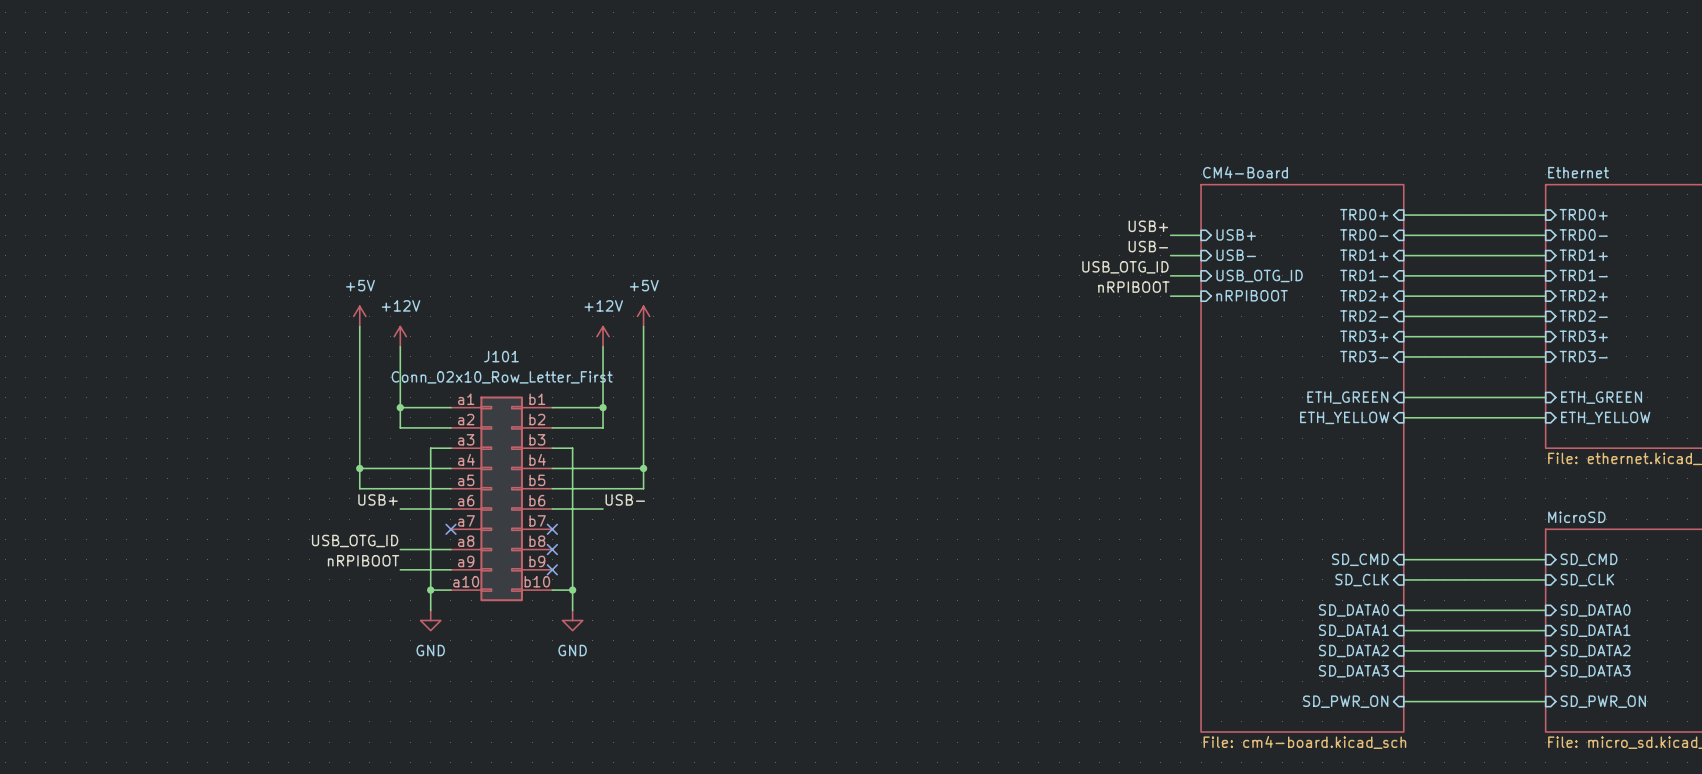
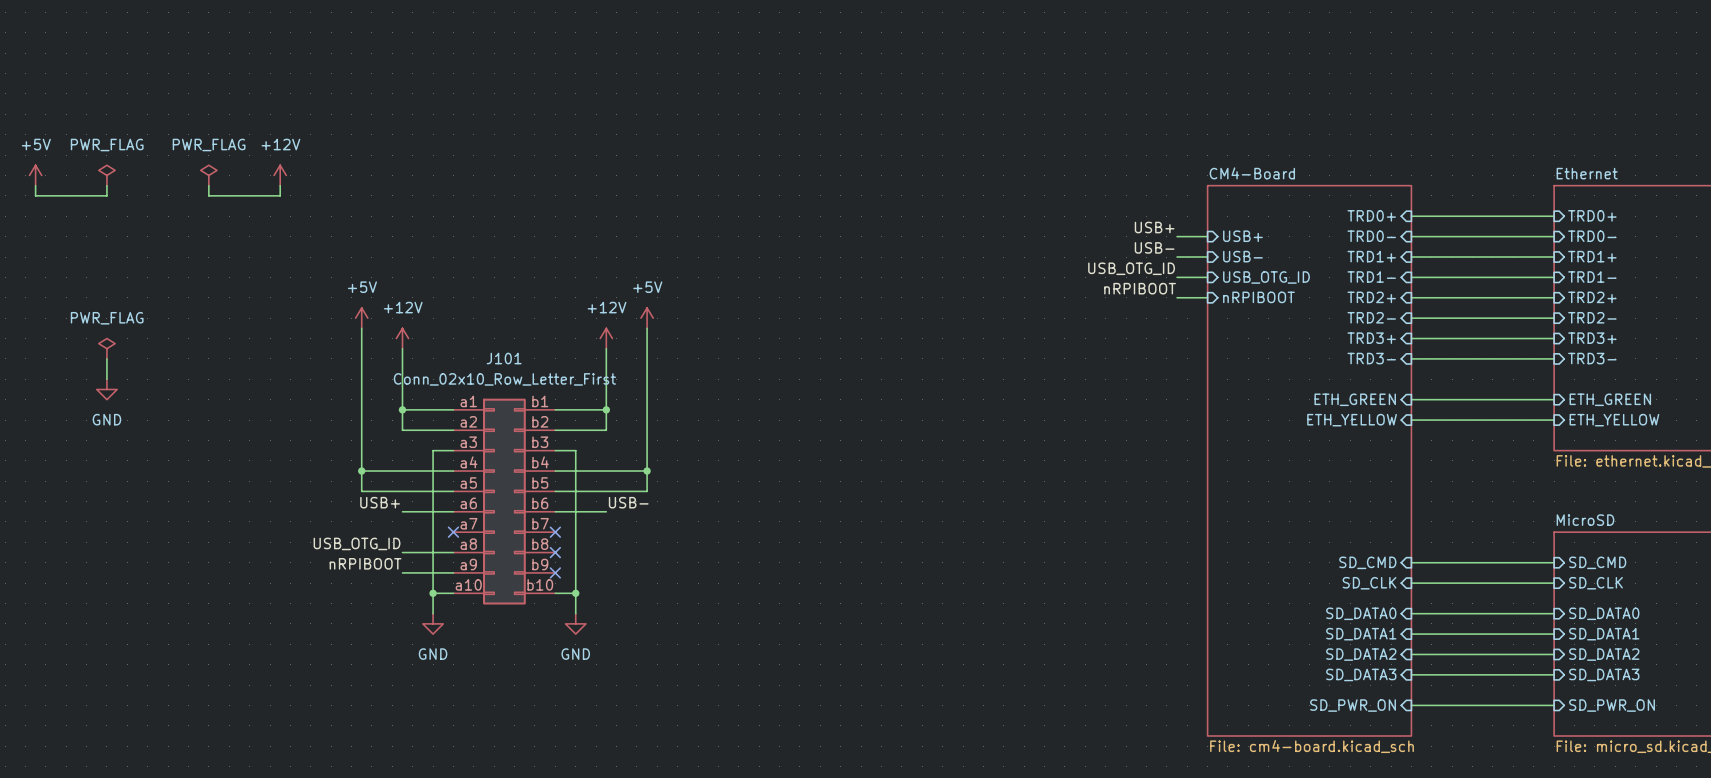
power symbol: none -> +5V (35, 175)
power symbol: none -> PWR_FLAG (106, 175)
power symbol: none -> PWR_FLAG (208, 175)
power symbol: none -> +12V (280, 175)
wire: none -> (35, 185) (35, 195) (106, 195) (106, 185)
wire: none -> (208, 185) (208, 195) (280, 195) (280, 185)
power symbol: none -> PWR_FLAG (106, 348)
wire: none -> (106, 358) (106, 379)
power symbol: none -> GND (106, 389)

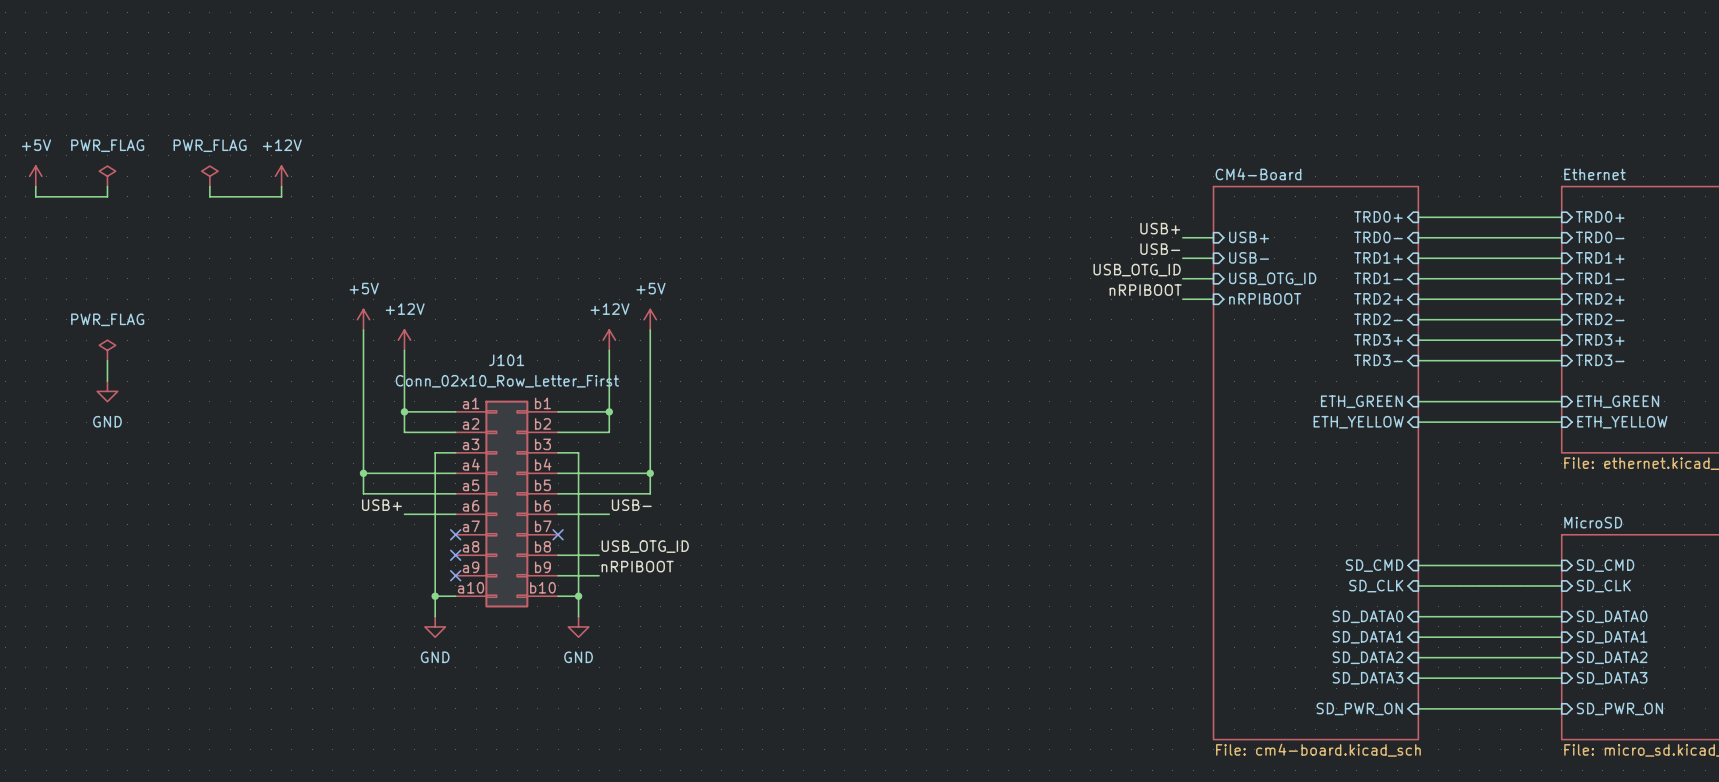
label position: USB_OTG_ID (357, 543) -> USB_OTG_ID (645, 546)
wire: (402, 552) (453, 552) -> none
no-connect mark: none -> (455, 555)
wire: none -> (558, 555) (599, 555)
no-connect mark: (555, 552) -> none
label position: nRPIBOOT (365, 563) -> nRPIBOOT (637, 566)
wire: (402, 572) (453, 572) -> none
no-connect mark: none -> (455, 575)
wire: none -> (558, 575) (599, 575)
no-connect mark: (555, 572) -> none

